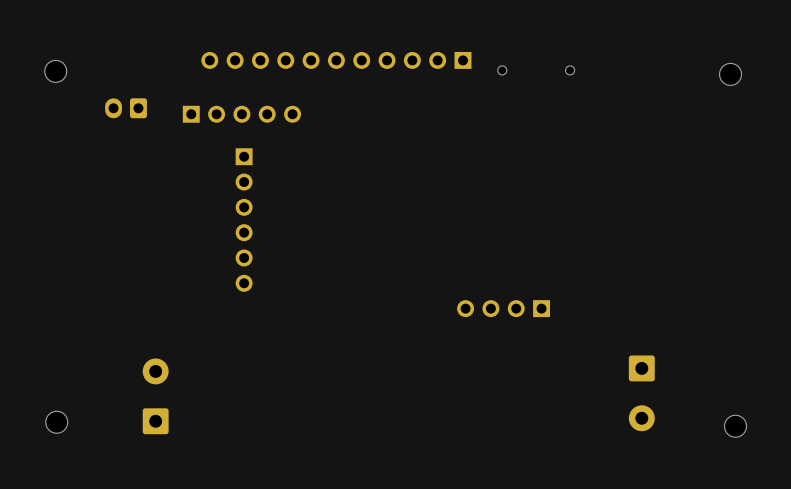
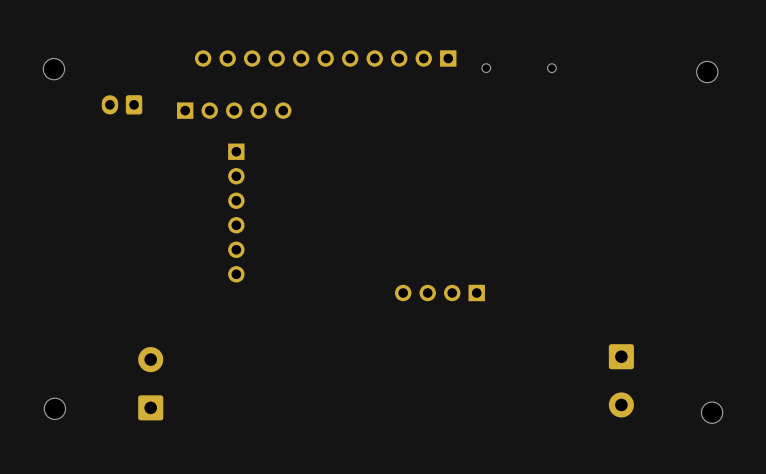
part position: (503, 308) -> (439, 293)

